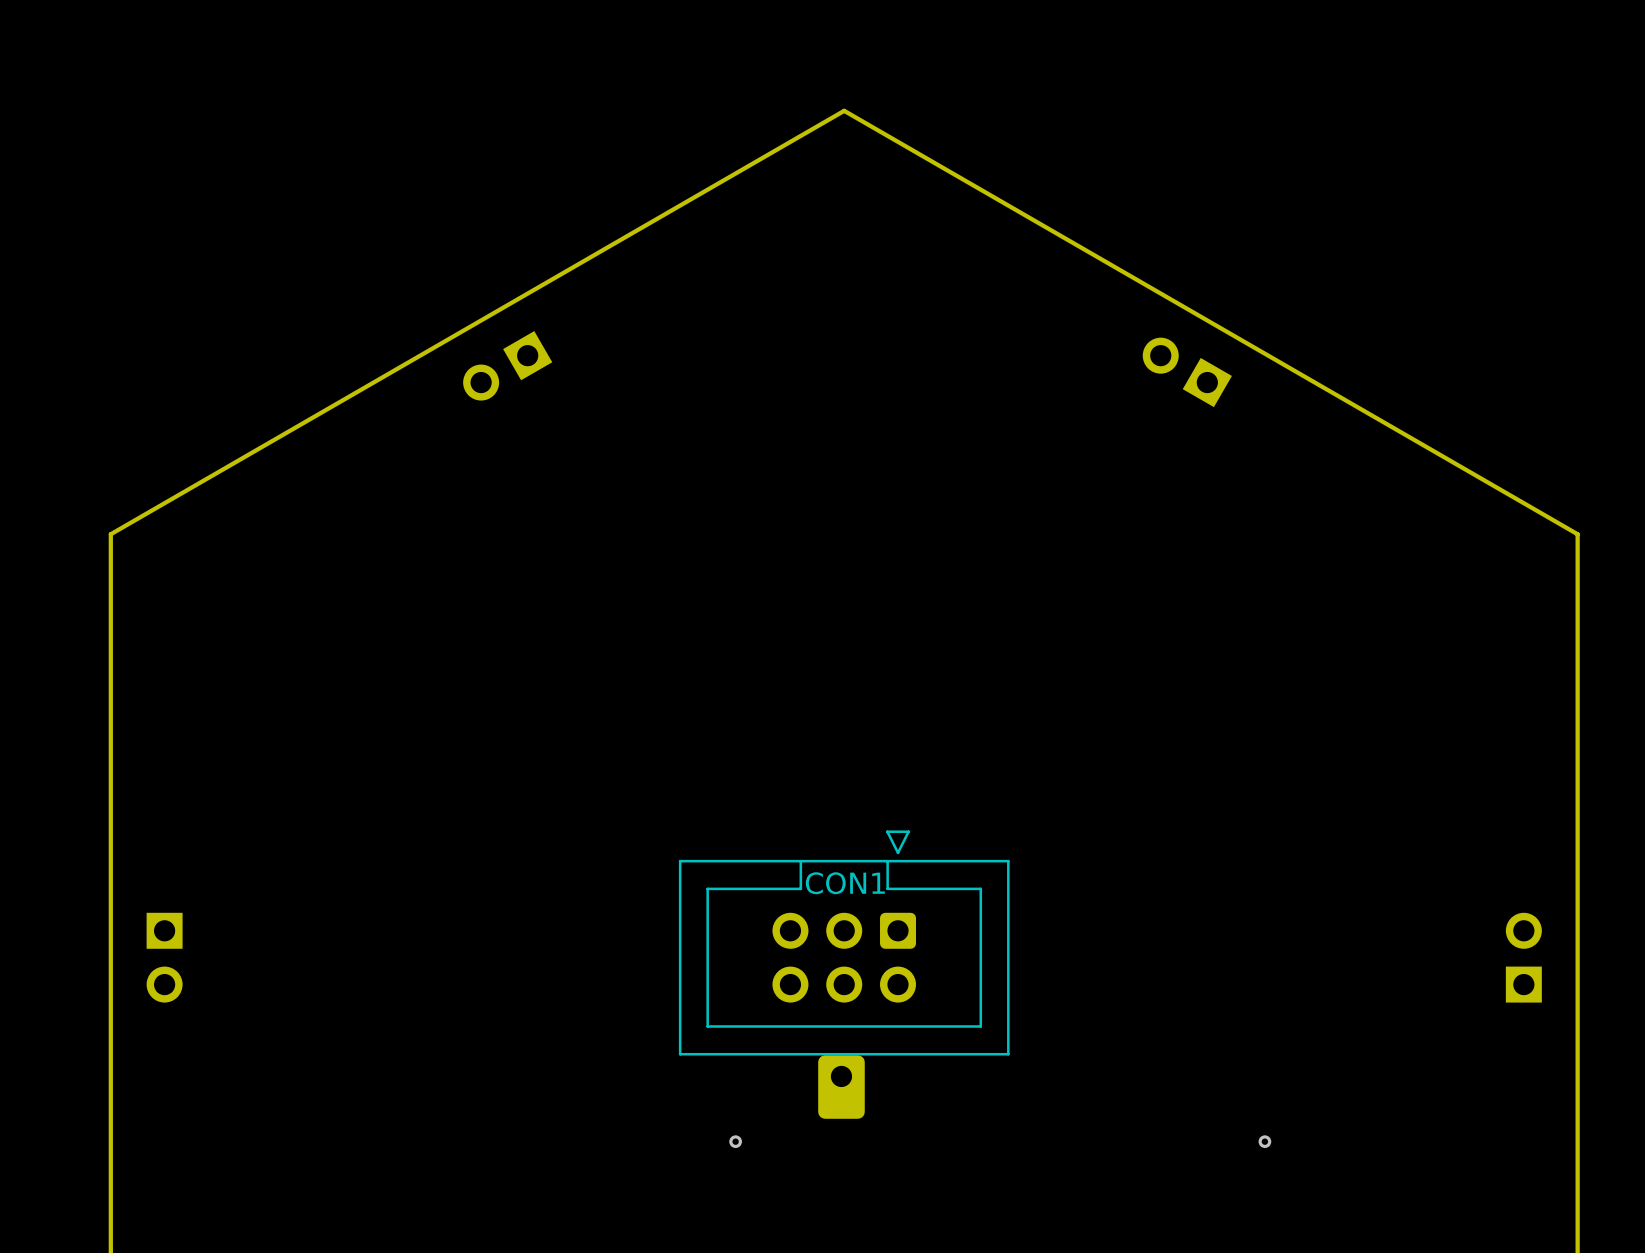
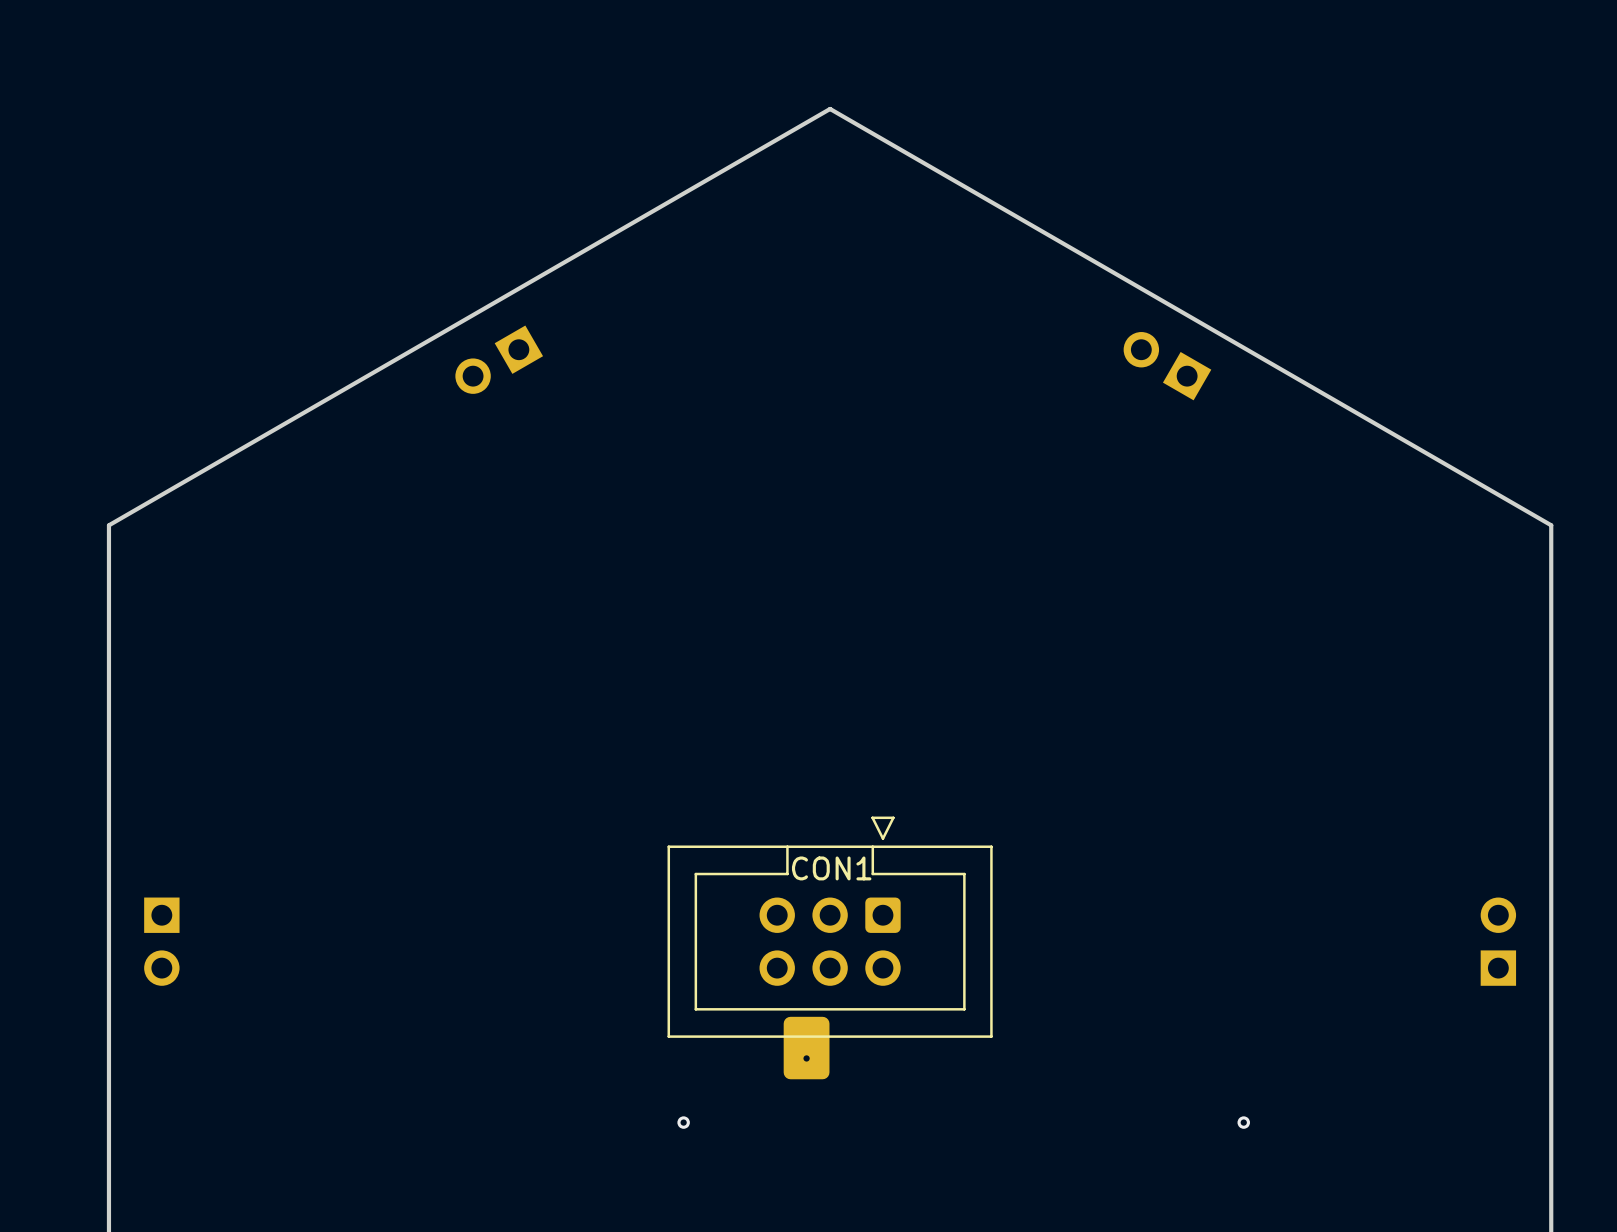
part: none -> (806, 1048)
part: (841, 1087) -> none
via position: (735, 1141) -> (683, 1122)

